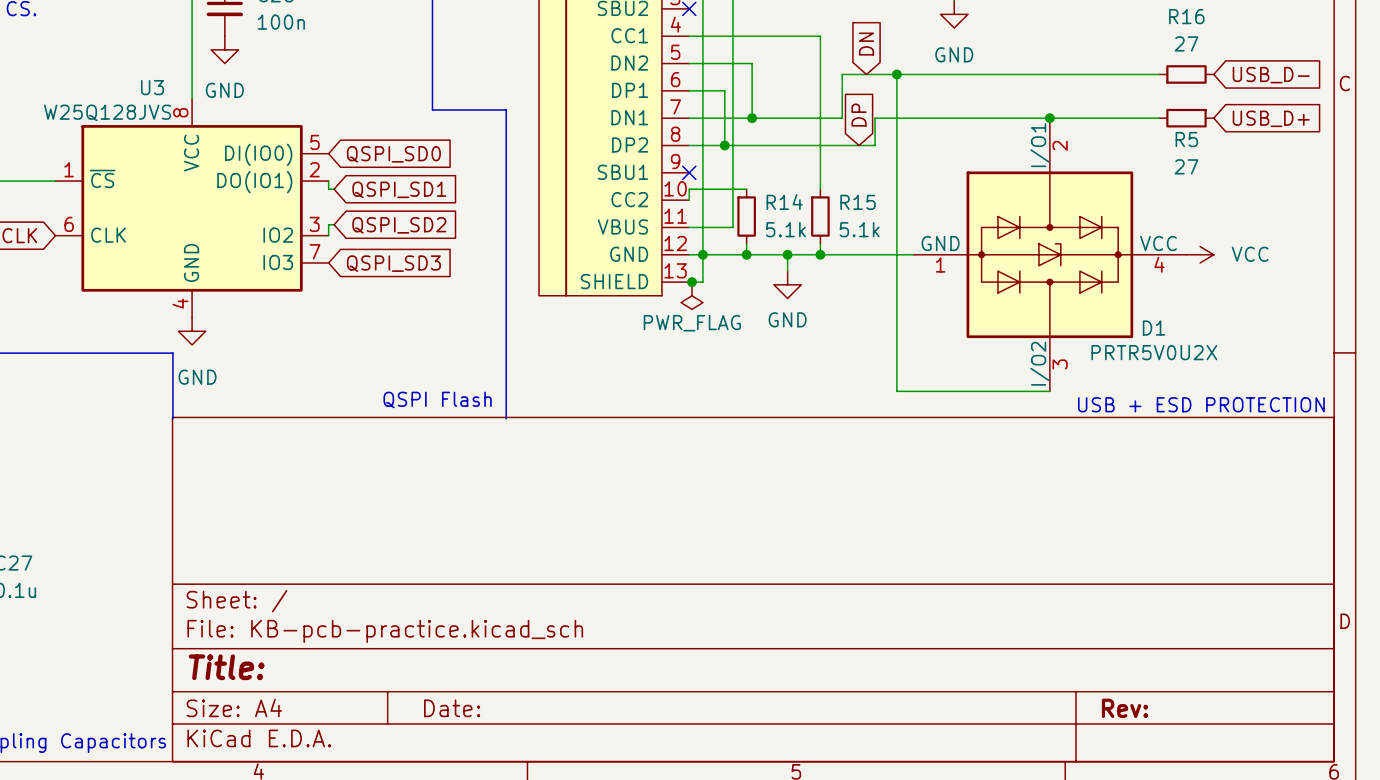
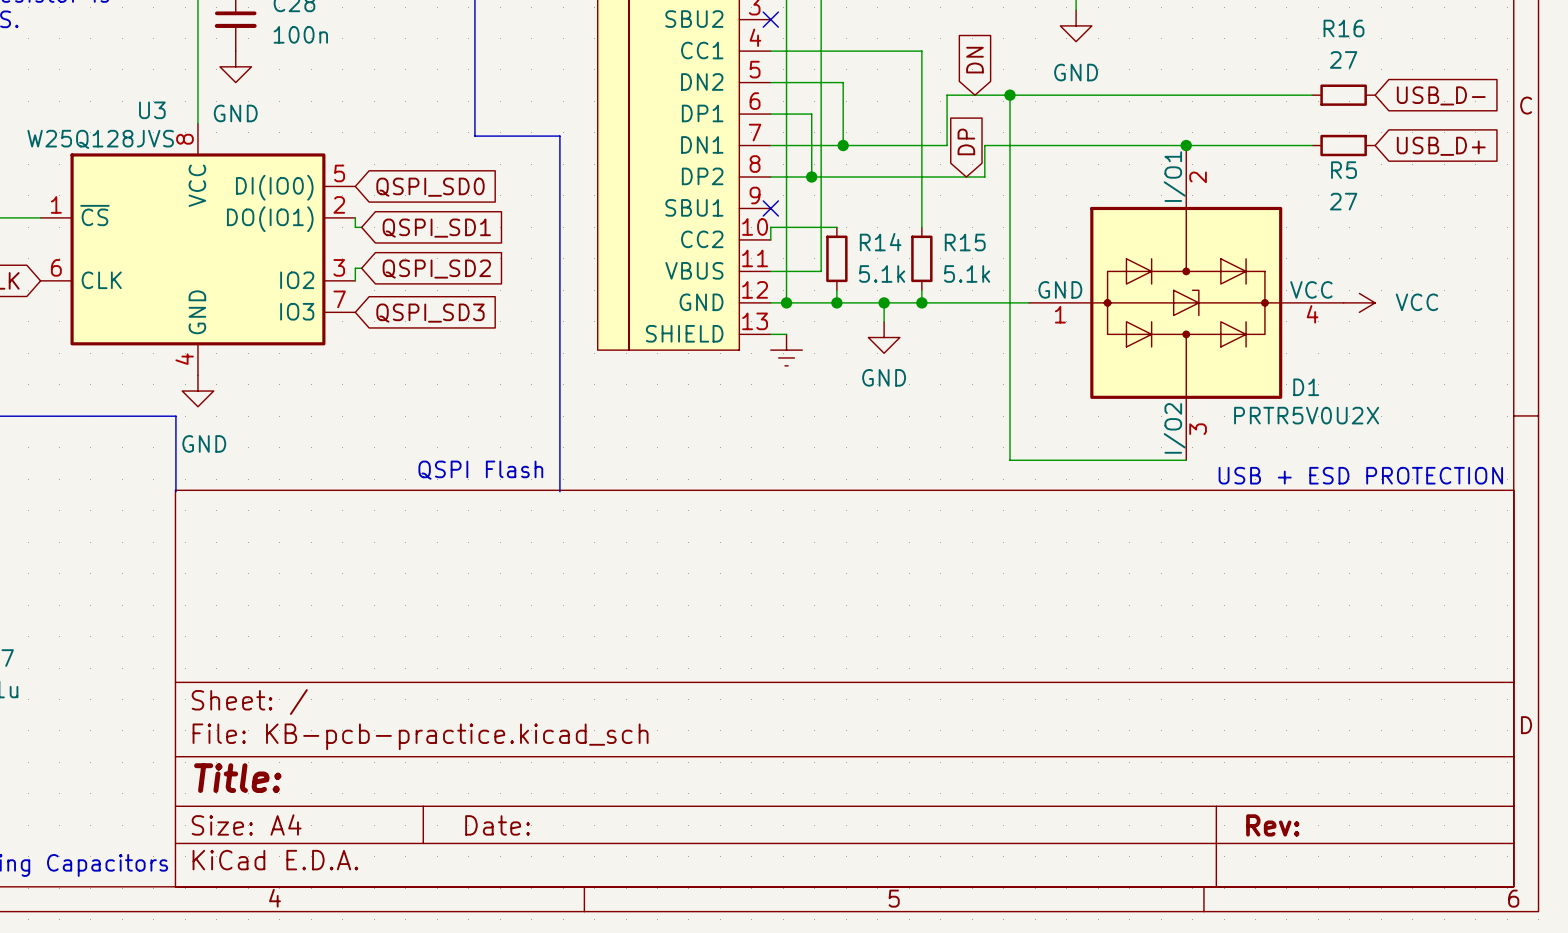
wire: (702, 254) (702, 282) -> none
junction: (692, 282) -> none
power symbol: PWR_FLAG (692, 295) -> none
power symbol: none -> (786, 350)

